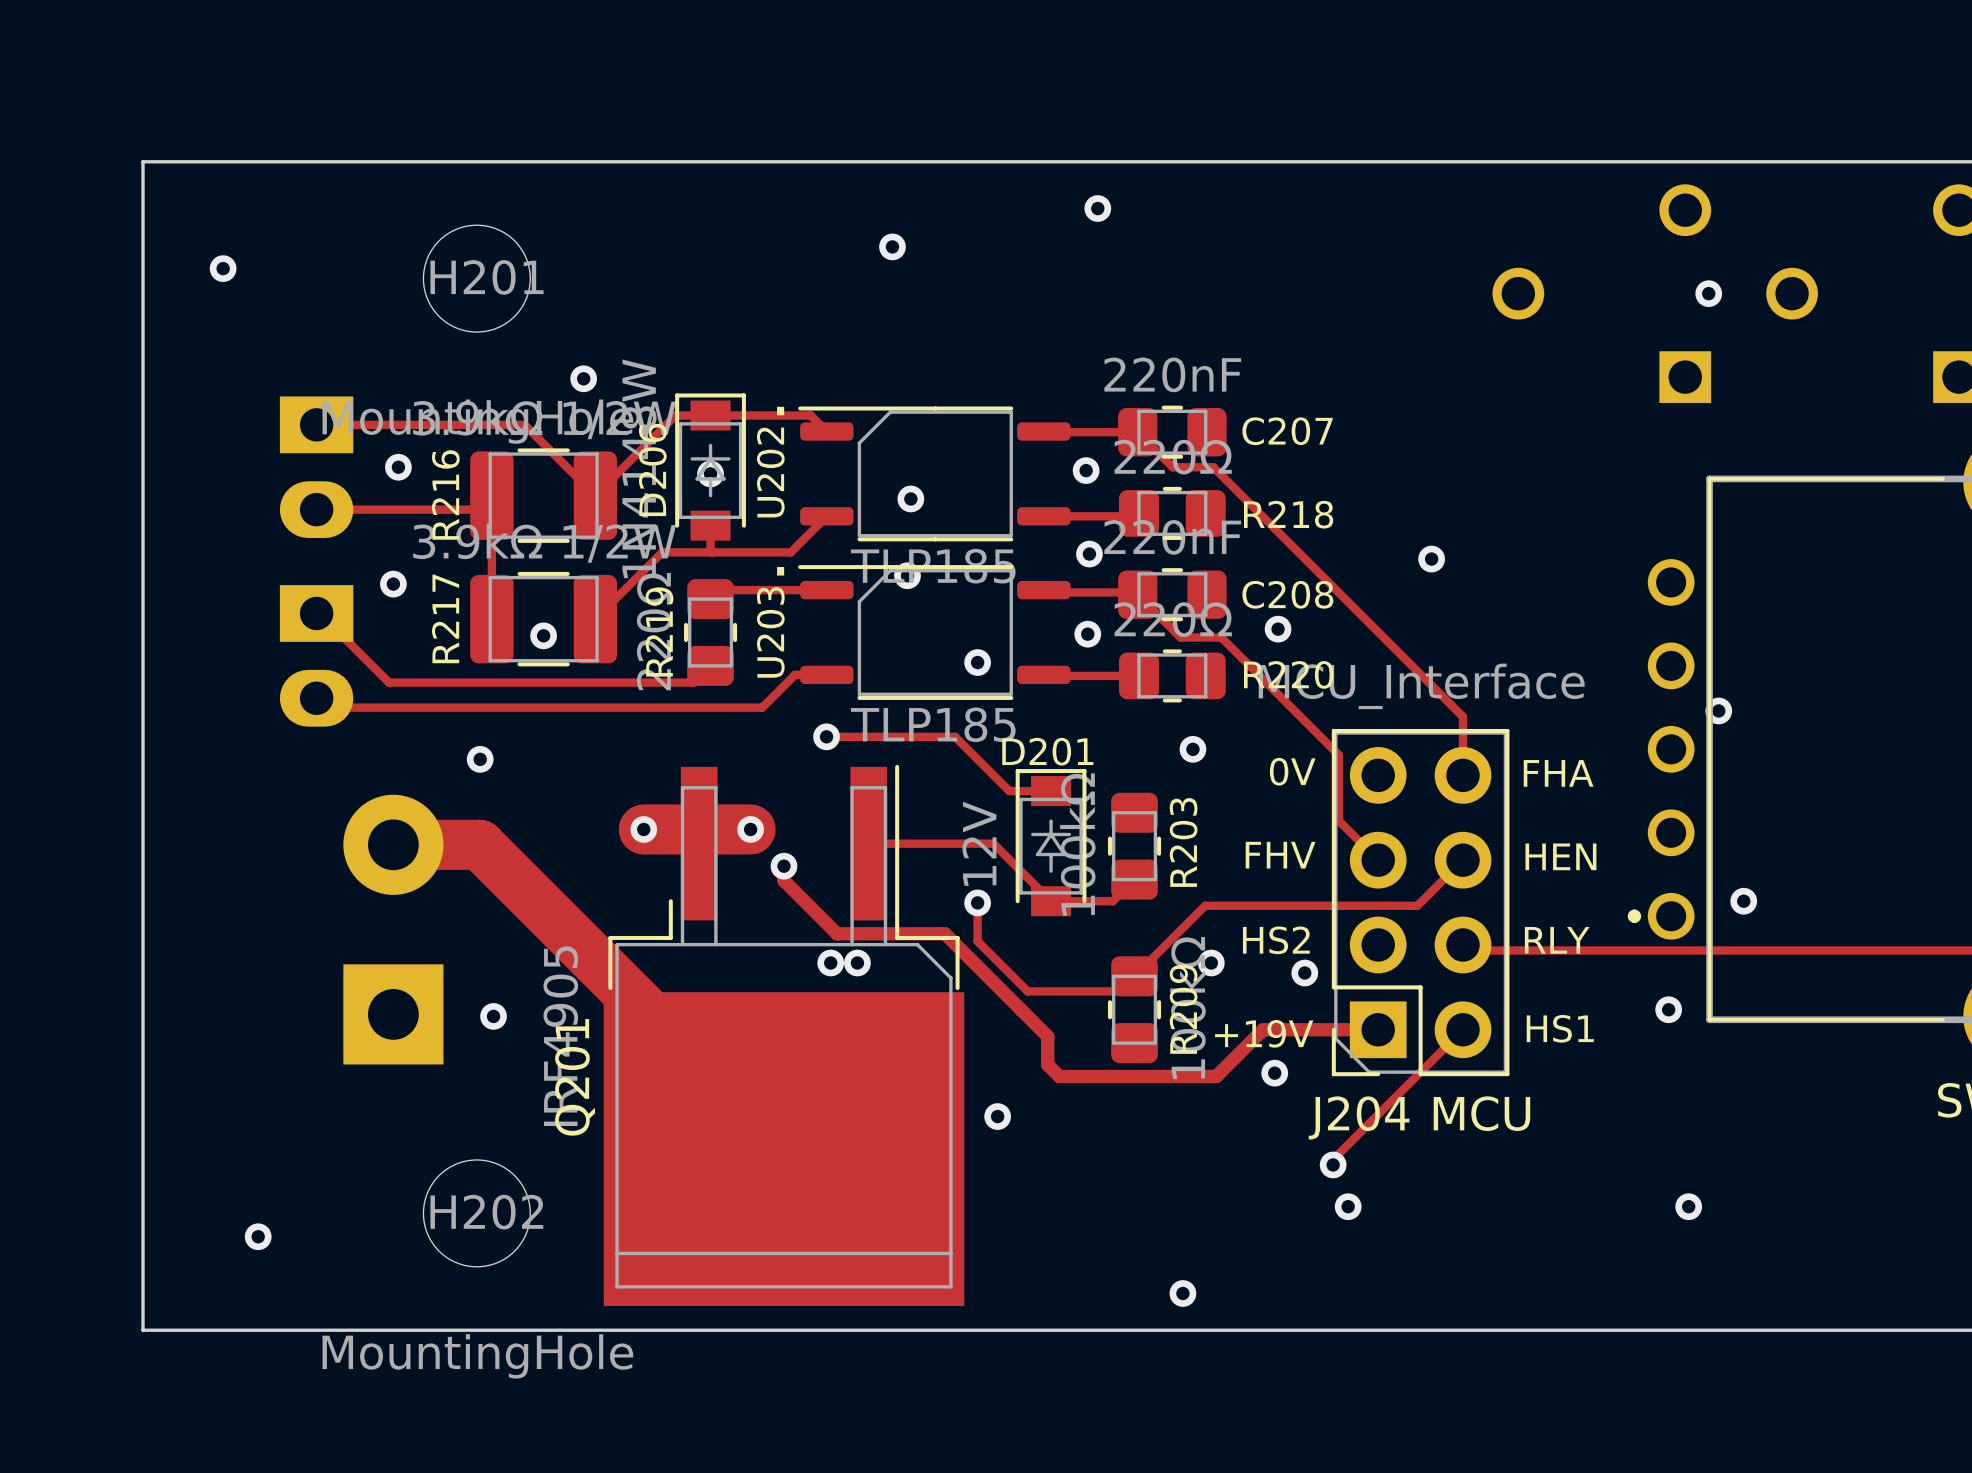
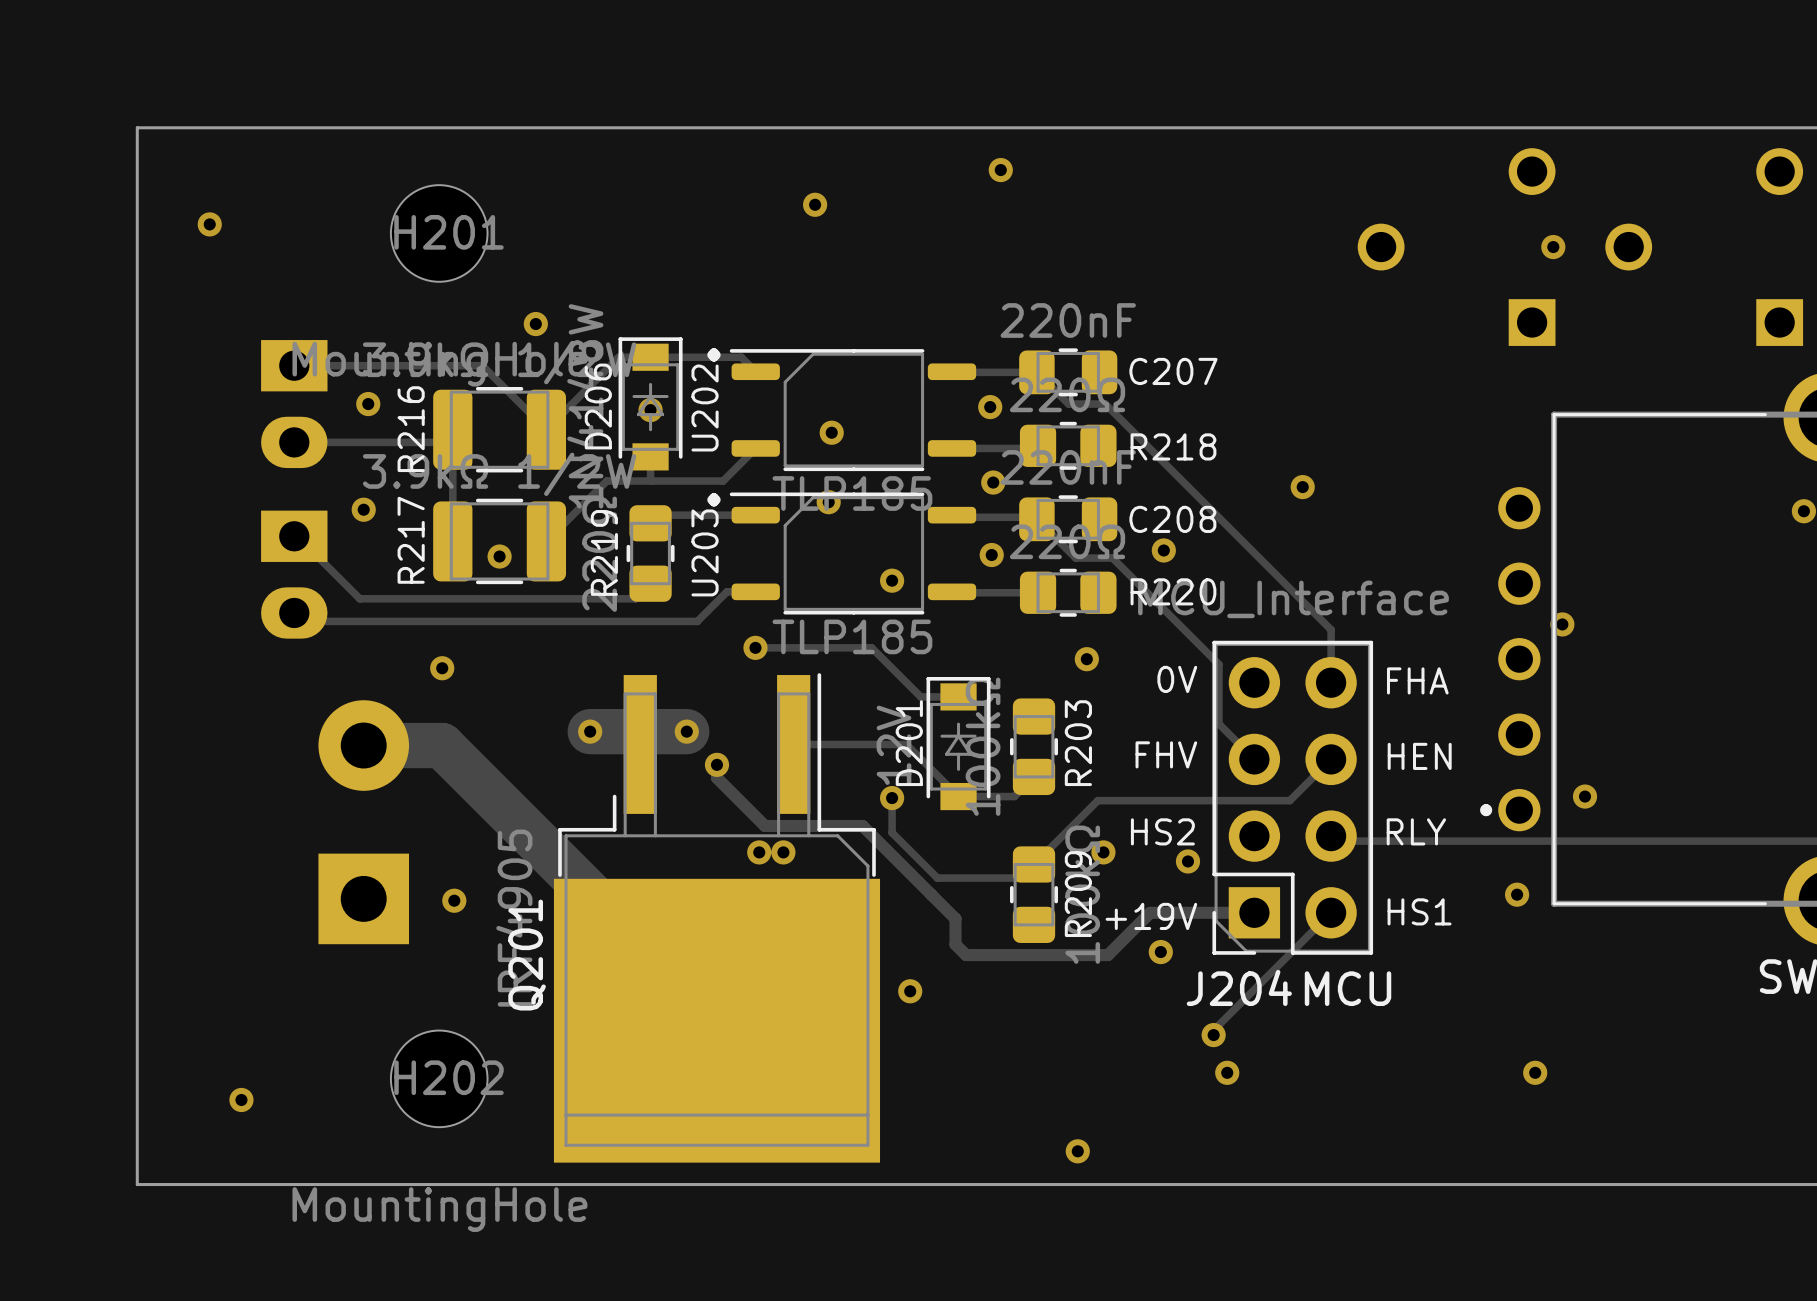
D201 name rotation: 0° (1047, 751) -> 90° counterclockwise (909, 743)

